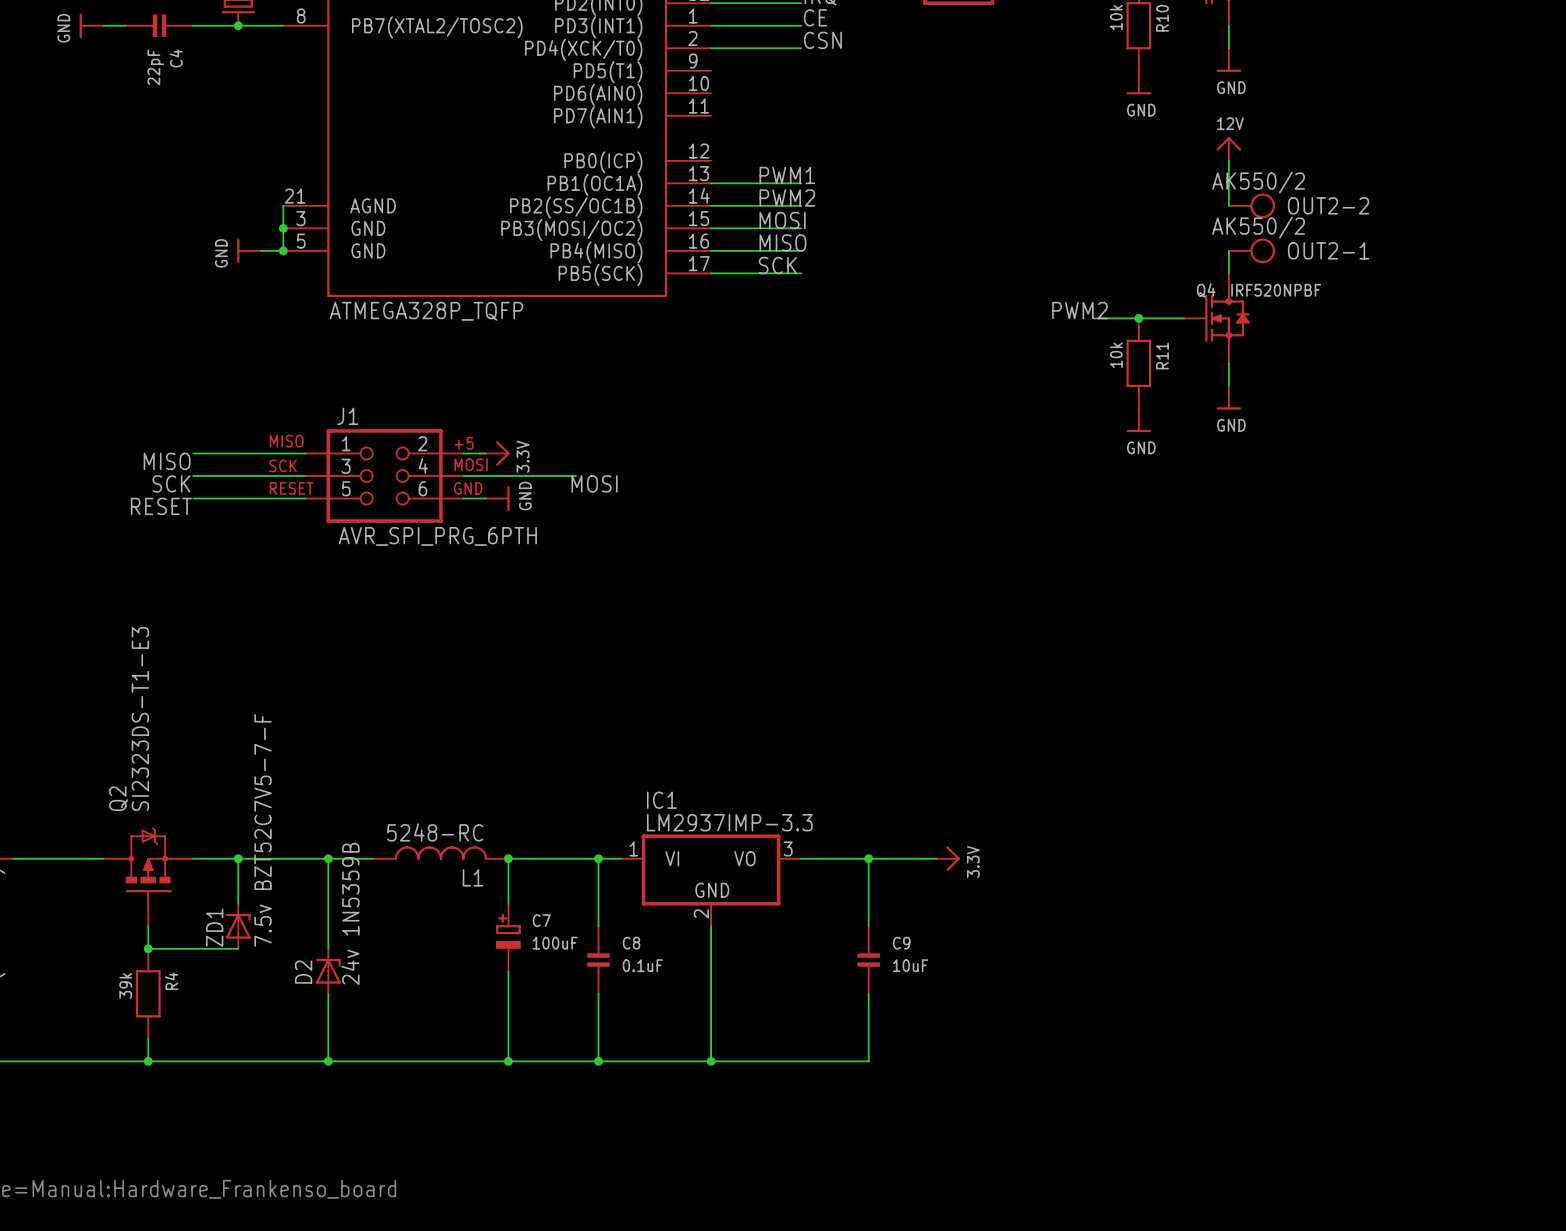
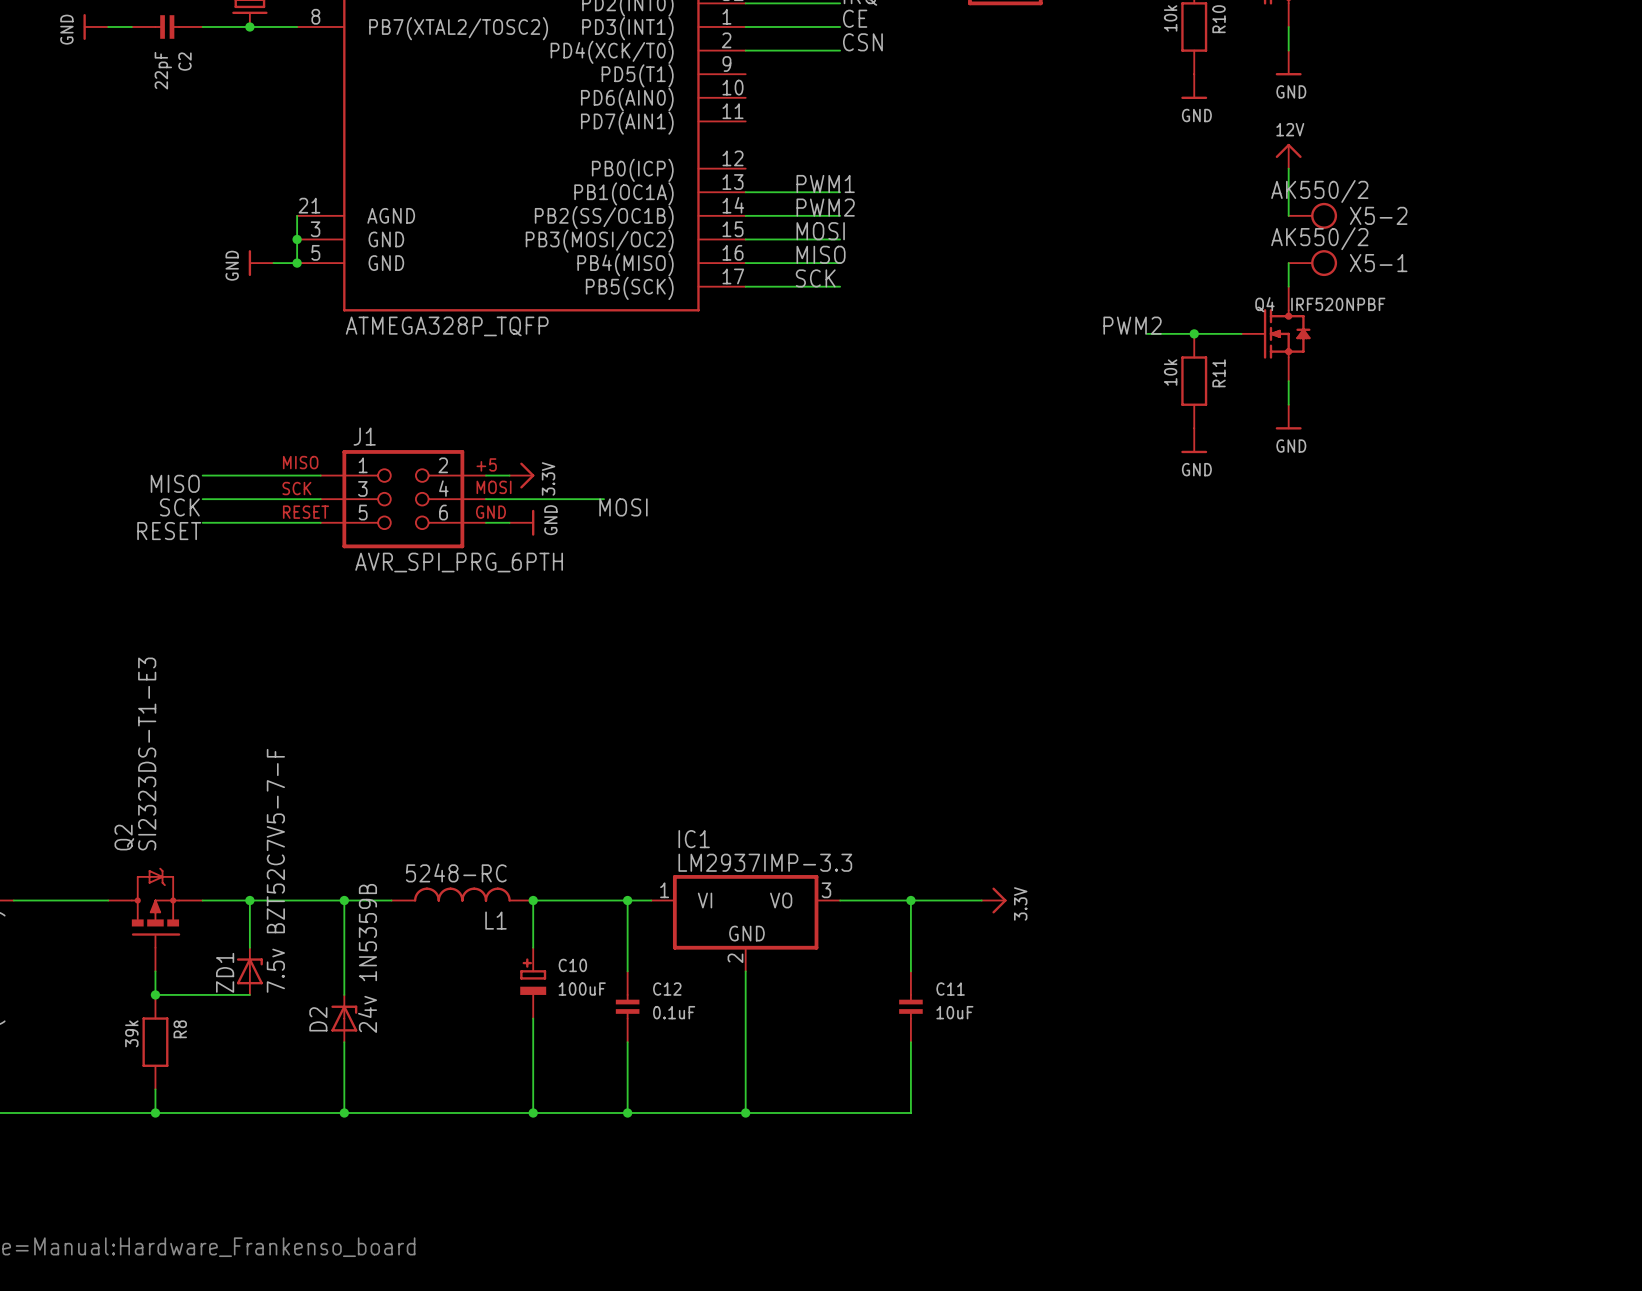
C4 name: C4 (176, 58) -> C2 (184, 61)
OUT2-2 name: OUT2-2 (1328, 205) -> X5-2 (1378, 215)
OUT2-1 name: OUT2-1 (1328, 250) -> X5-1 (1378, 263)
C7 name: C7 (541, 920) -> C10 (572, 965)
C8 name: C8 (631, 943) -> C12 (667, 989)
C9 name: C9 (901, 943) -> C11 (950, 989)
R4 name: R4 (171, 981) -> R8 (180, 1029)

